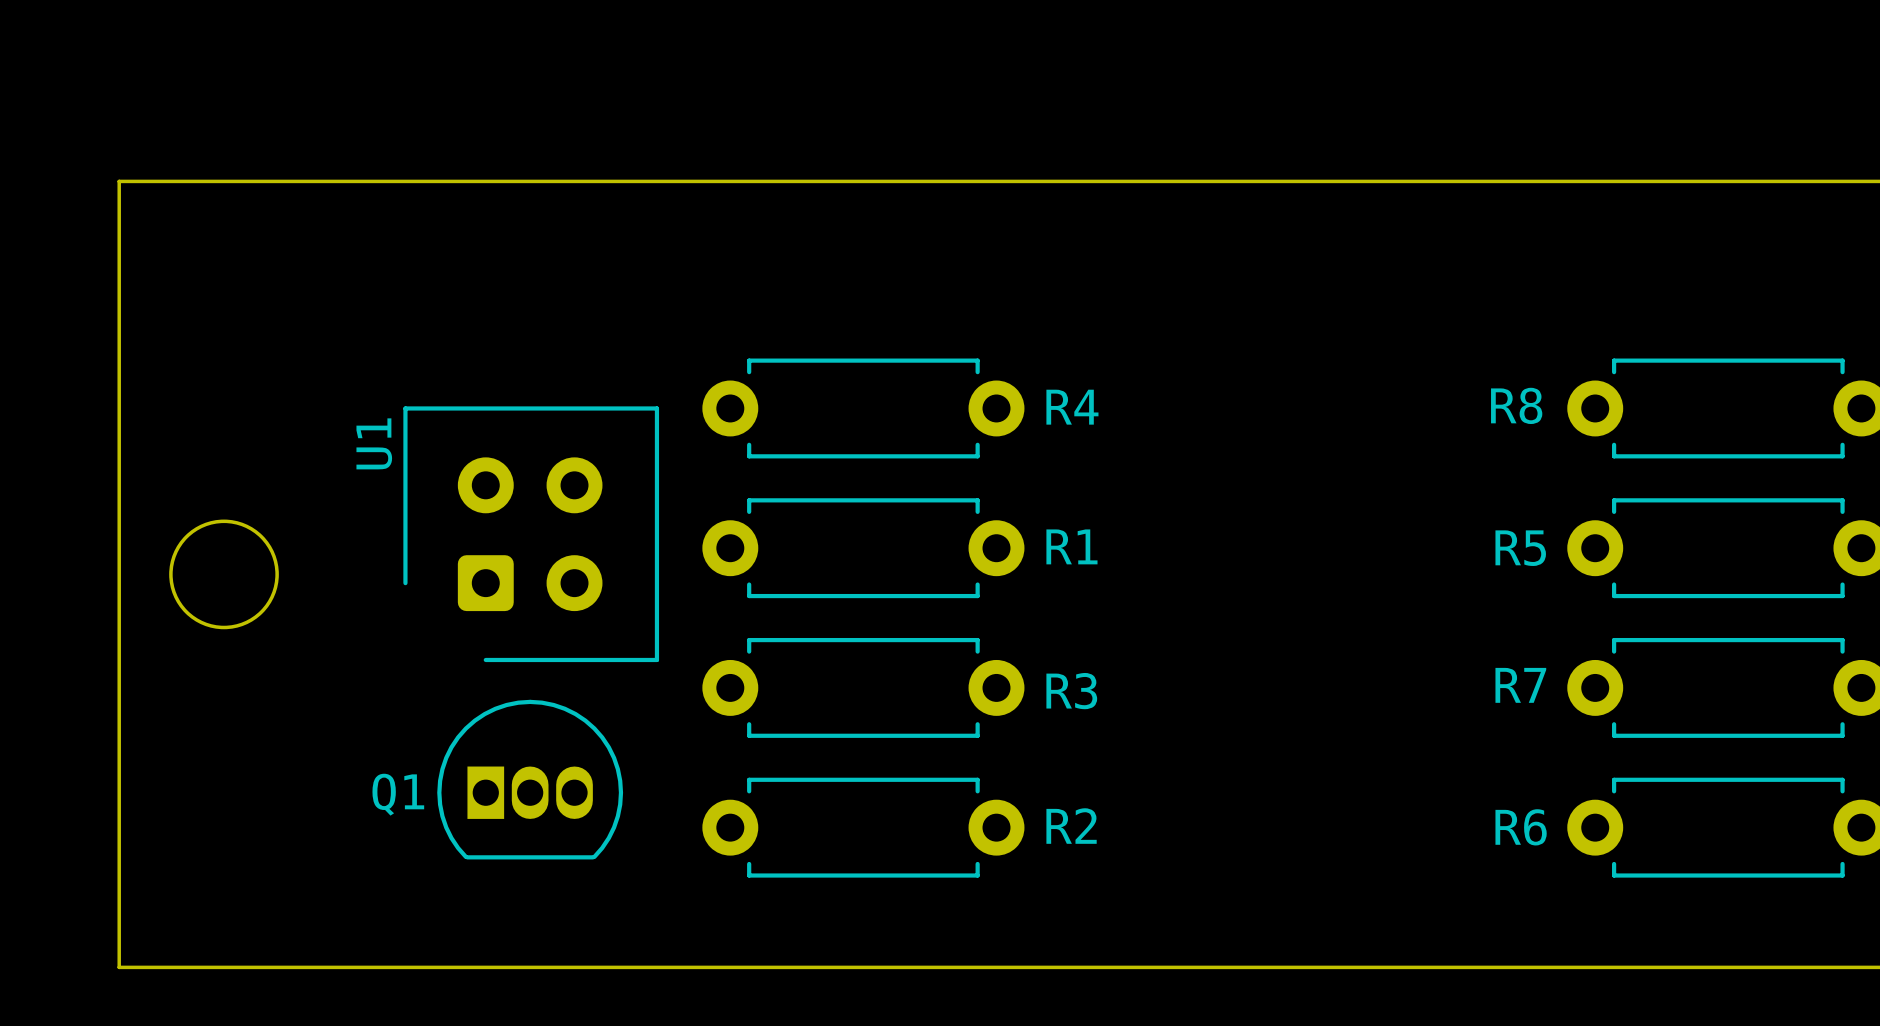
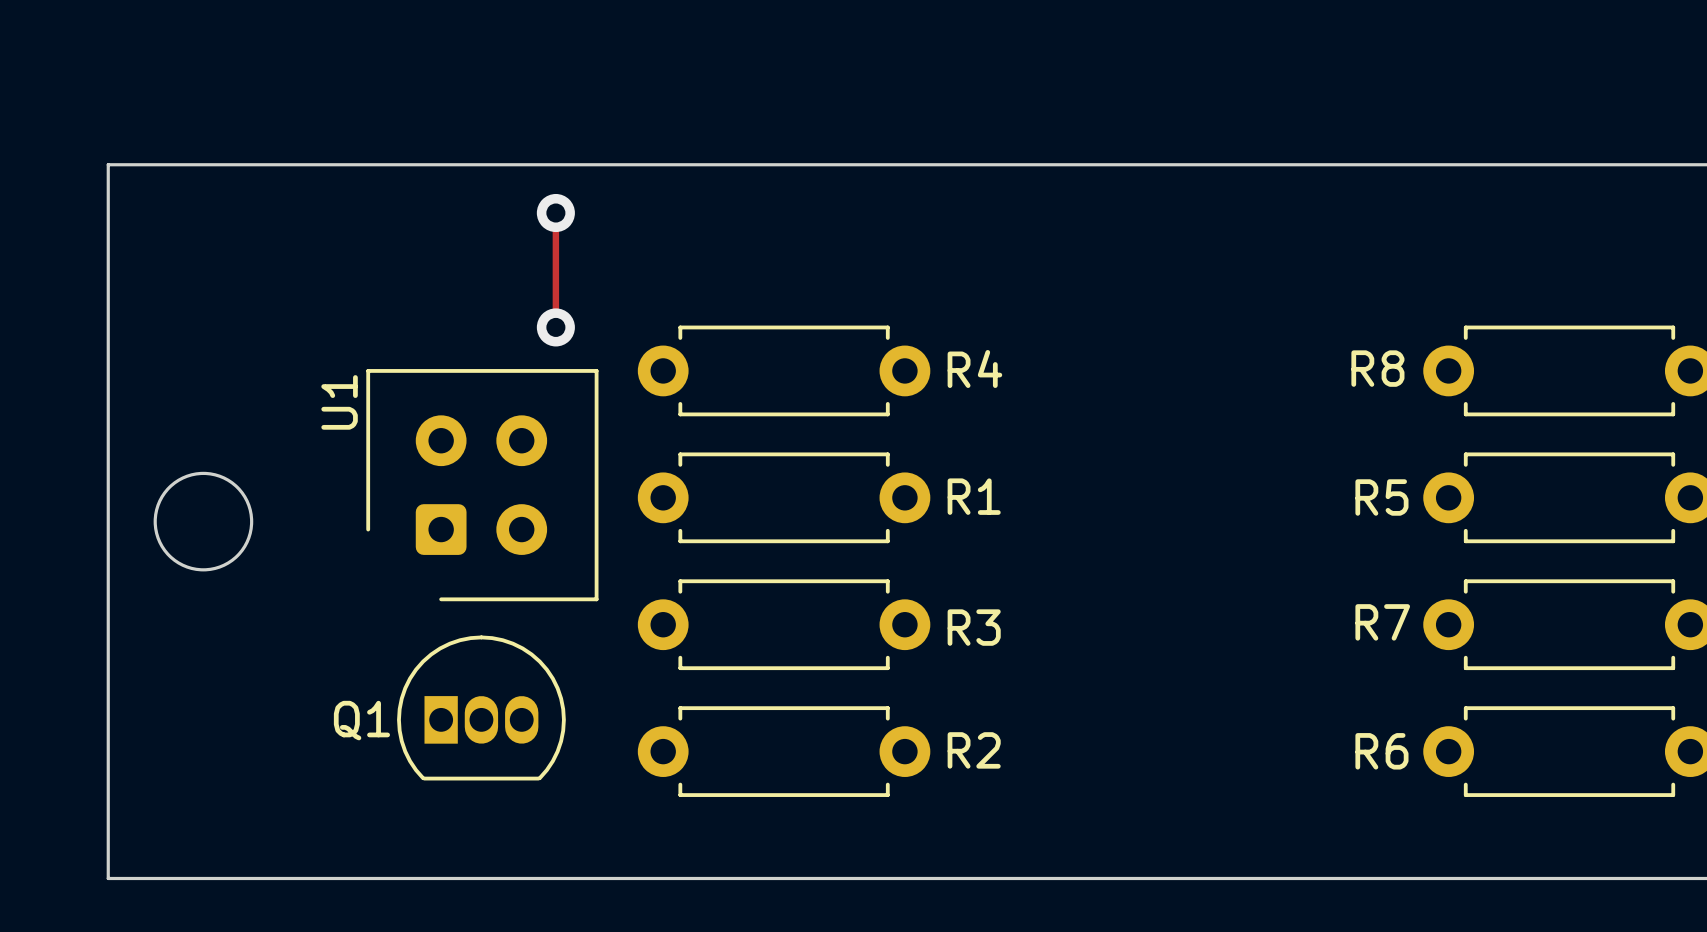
track: none -> (555, 213) (555, 327)
via: none -> (555, 213)
via: none -> (555, 327)

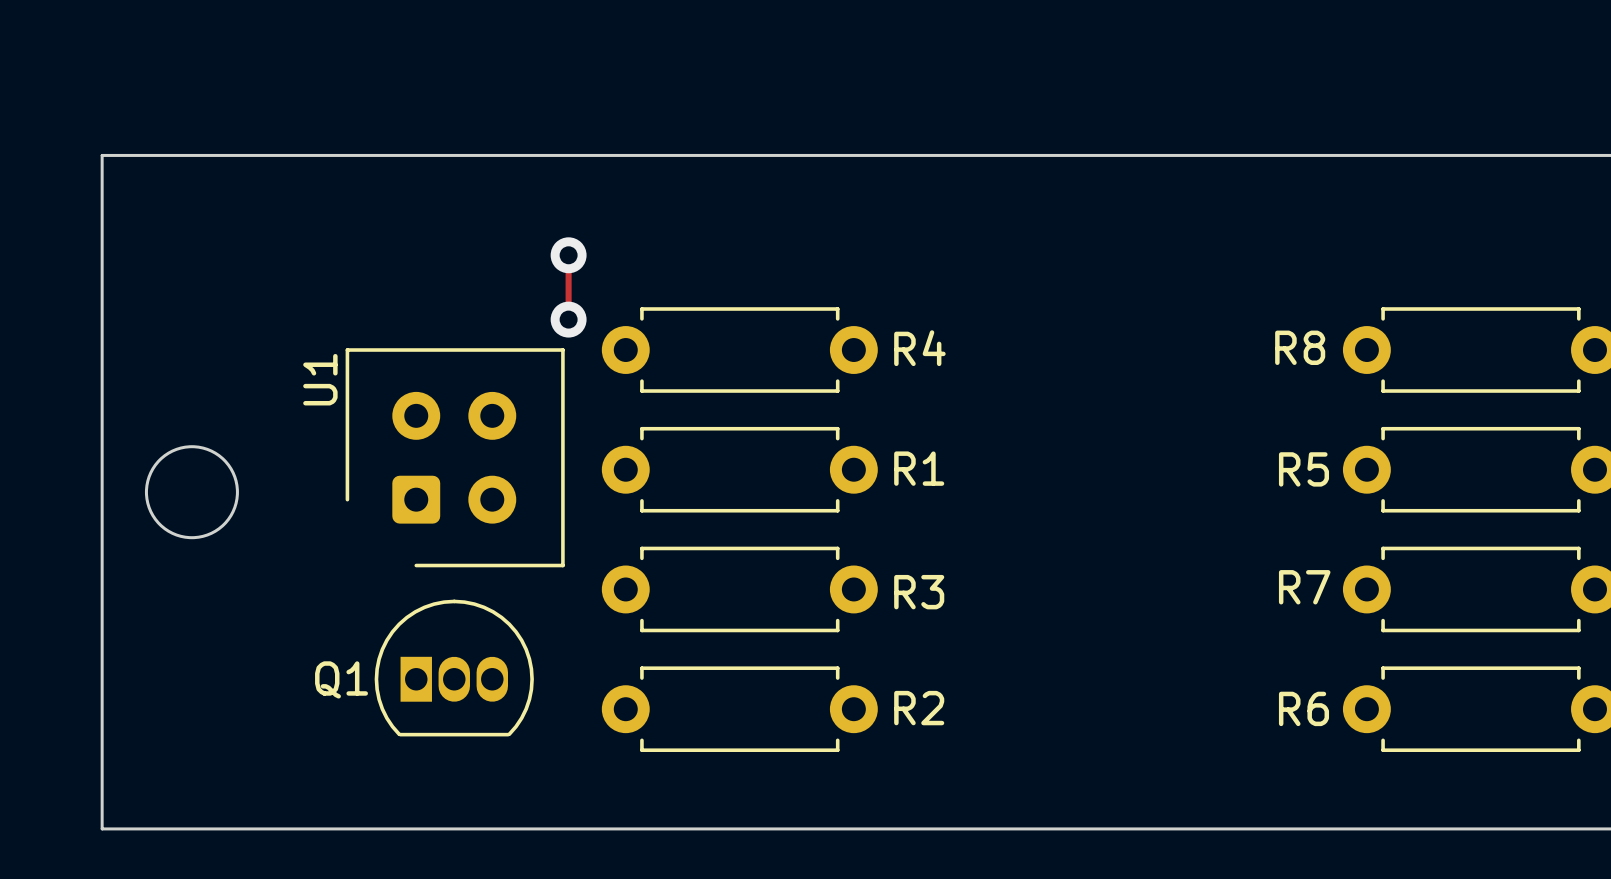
track: (555, 213) (555, 327) -> none
via: (555, 213) -> none
track: none -> (568, 255) (568, 319)
via: none -> (568, 255)
via: (555, 327) -> none
via: none -> (568, 319)

